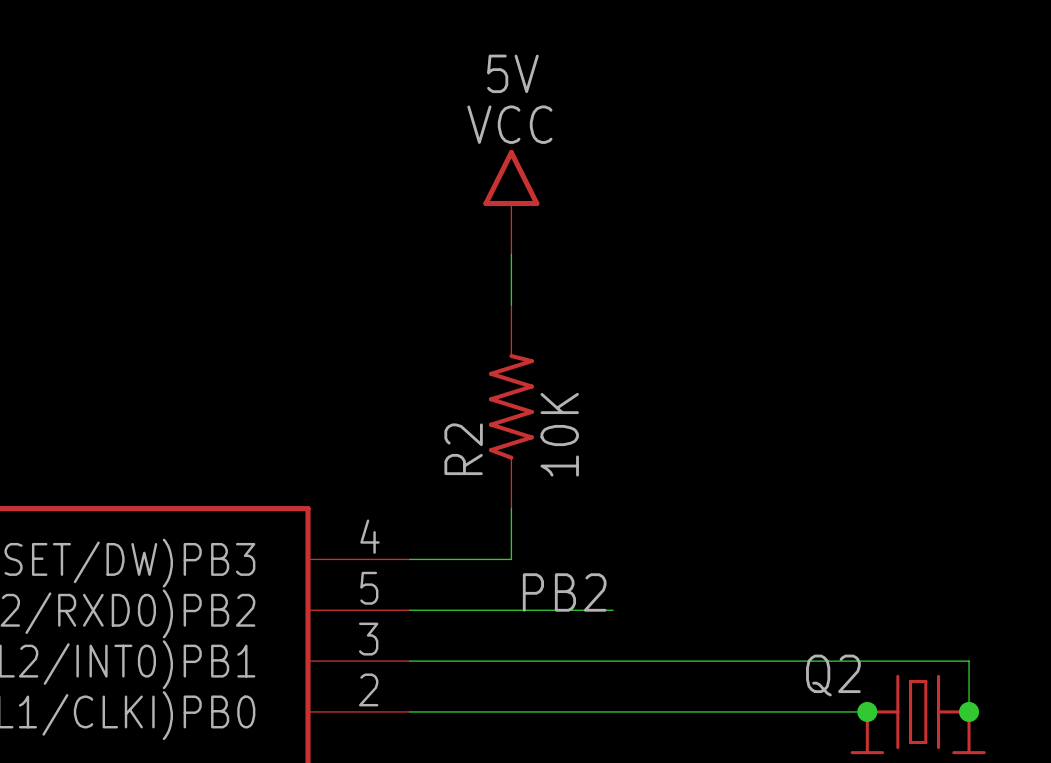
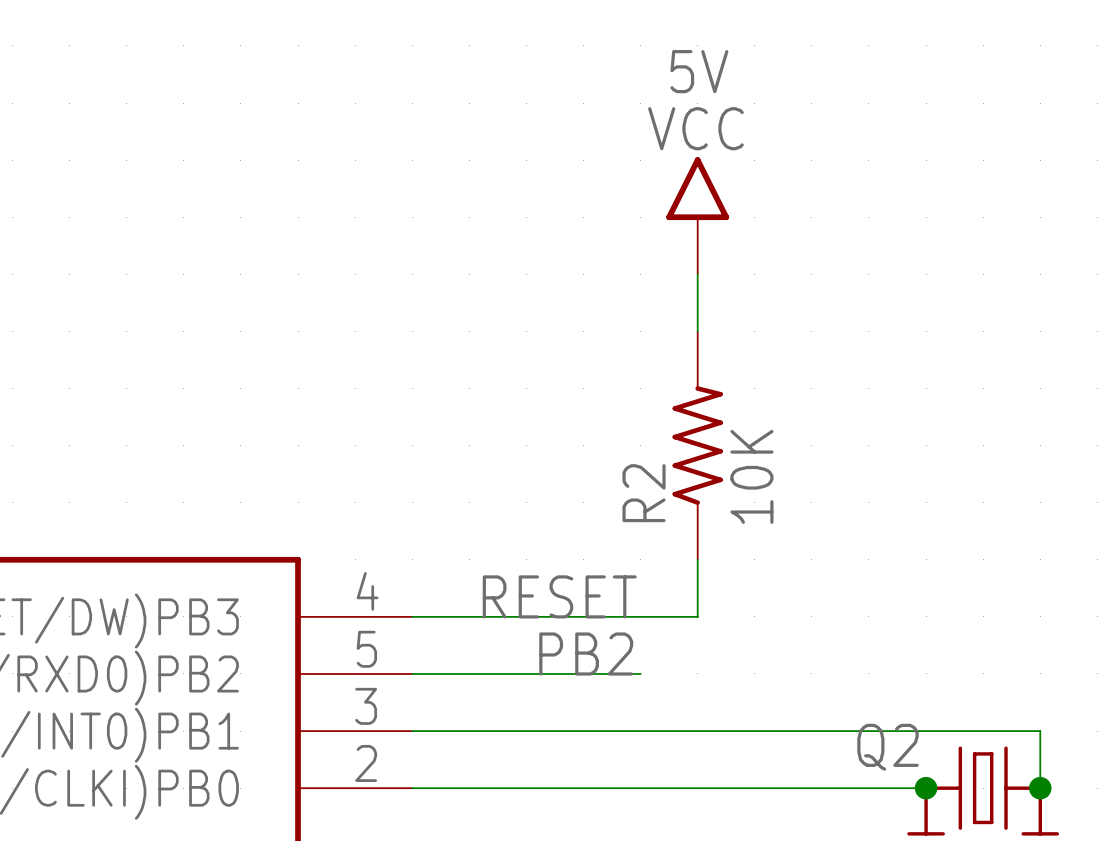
power symbol position: 5V (511, 202) -> 5V (697, 215)
wire: (511, 254) (511, 305) -> (697, 274) (697, 331)
R2 position: (511, 406) -> (697, 445)
wire: (511, 508) (511, 559) -> (697, 559) (697, 616) (526, 616)
label: none -> RESET (559, 596)

